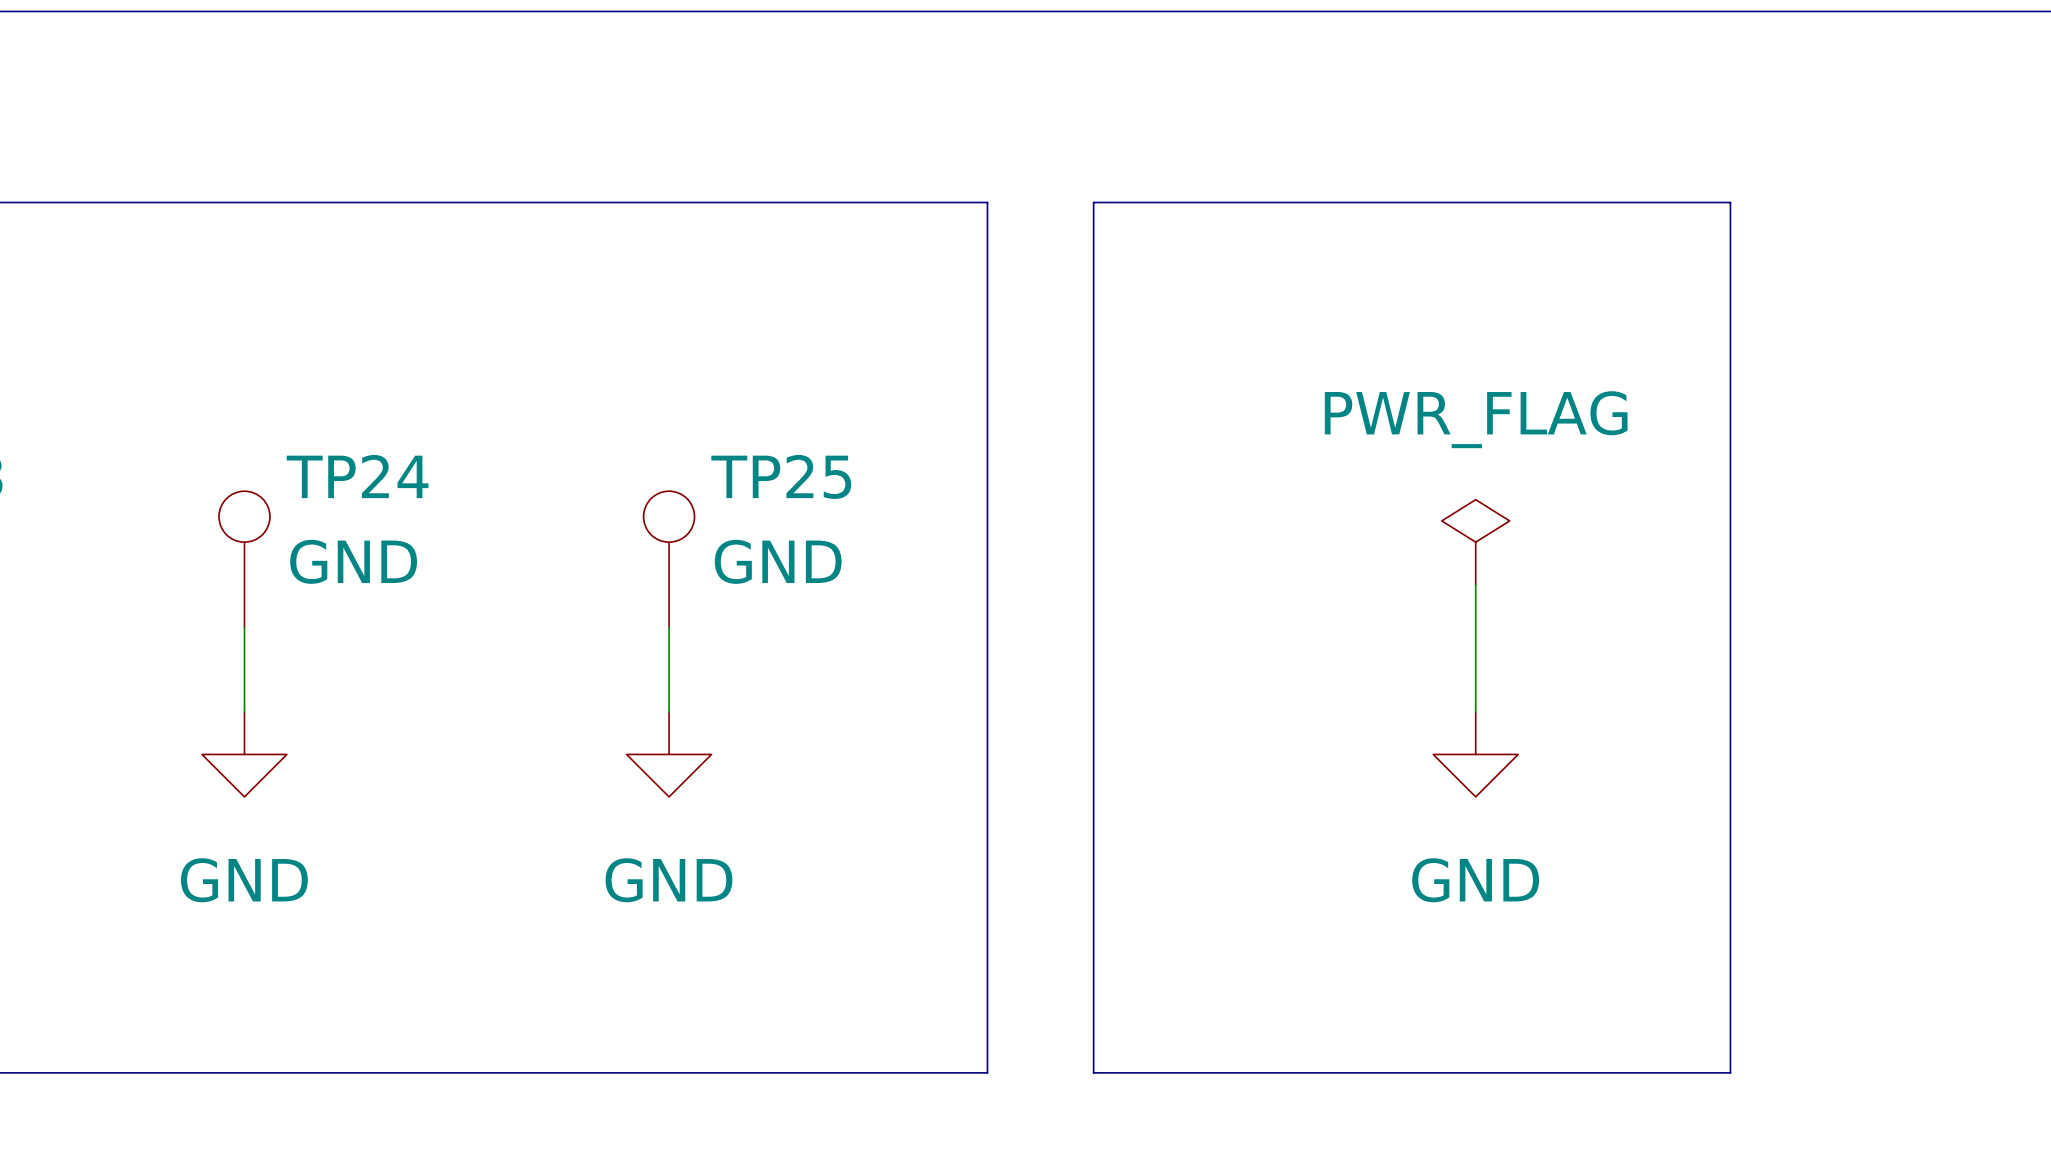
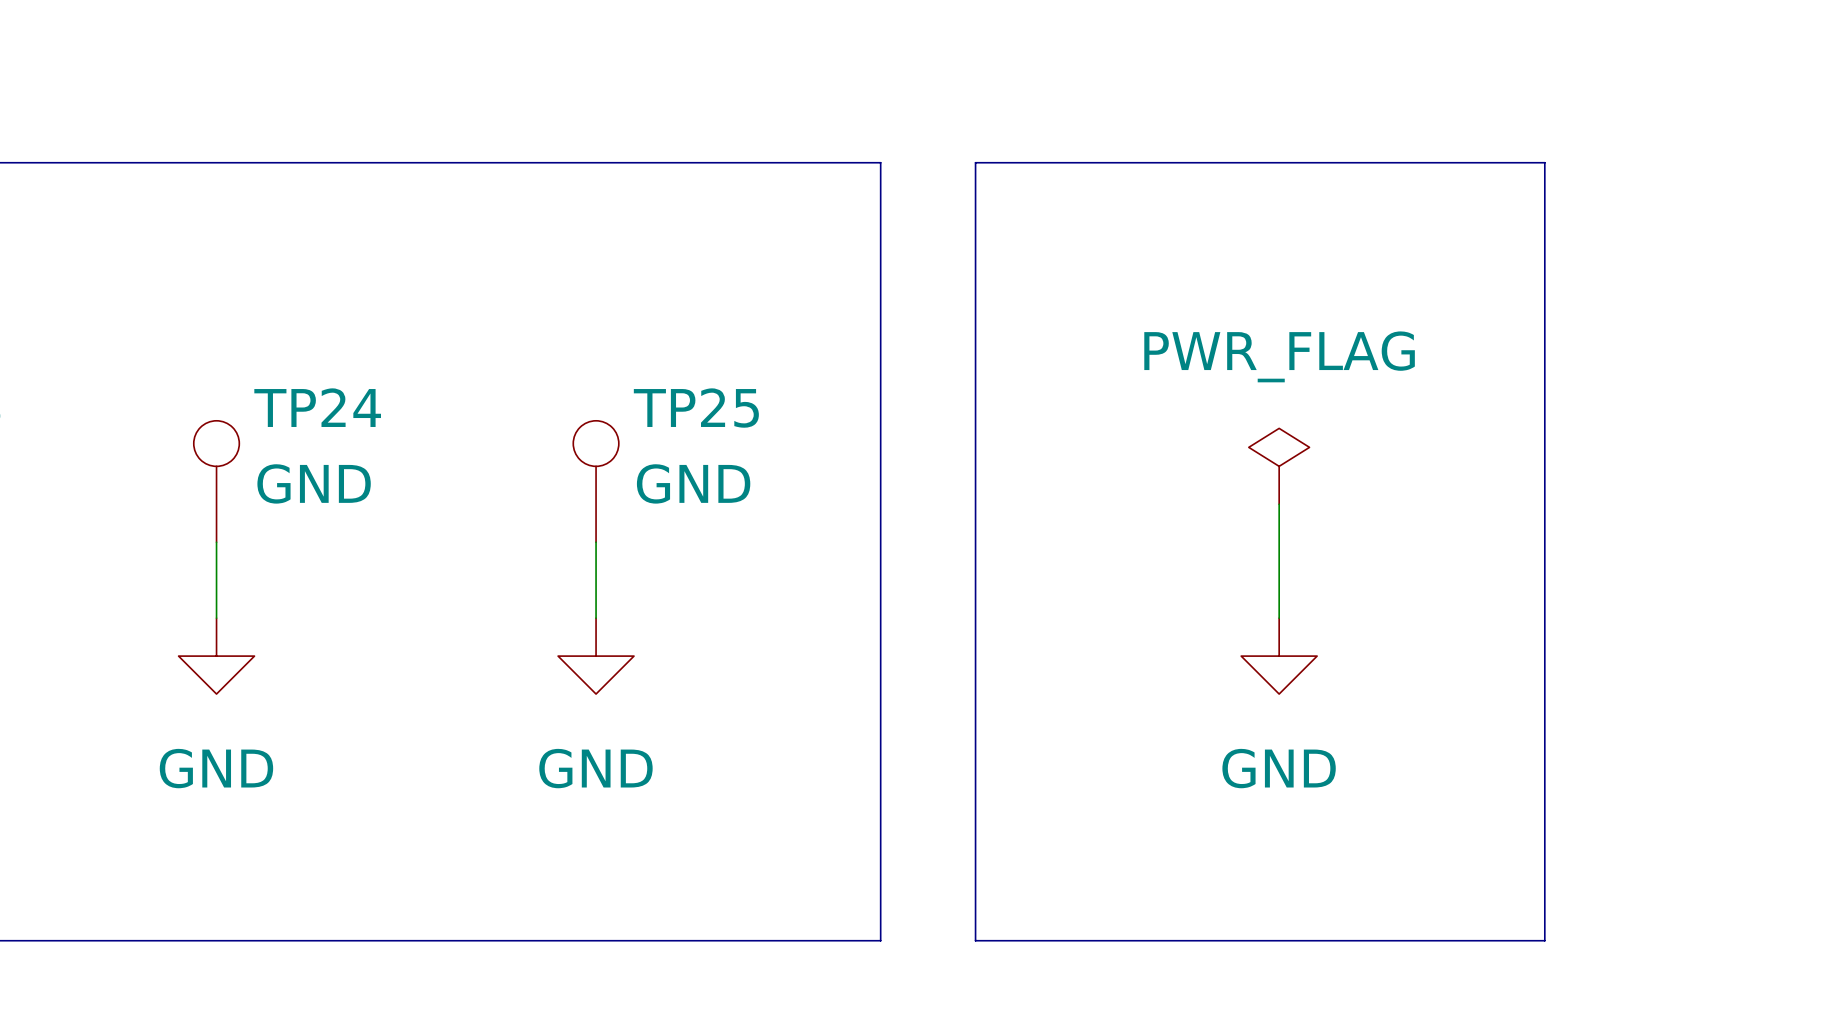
power symbol position: PWR_FLAG (1475, 542) -> PWR_FLAG (1279, 466)
wire: (1475, 584) (1475, 711) -> (1279, 504) (1279, 618)
power symbol position: GND (1475, 754) -> GND (1279, 656)

